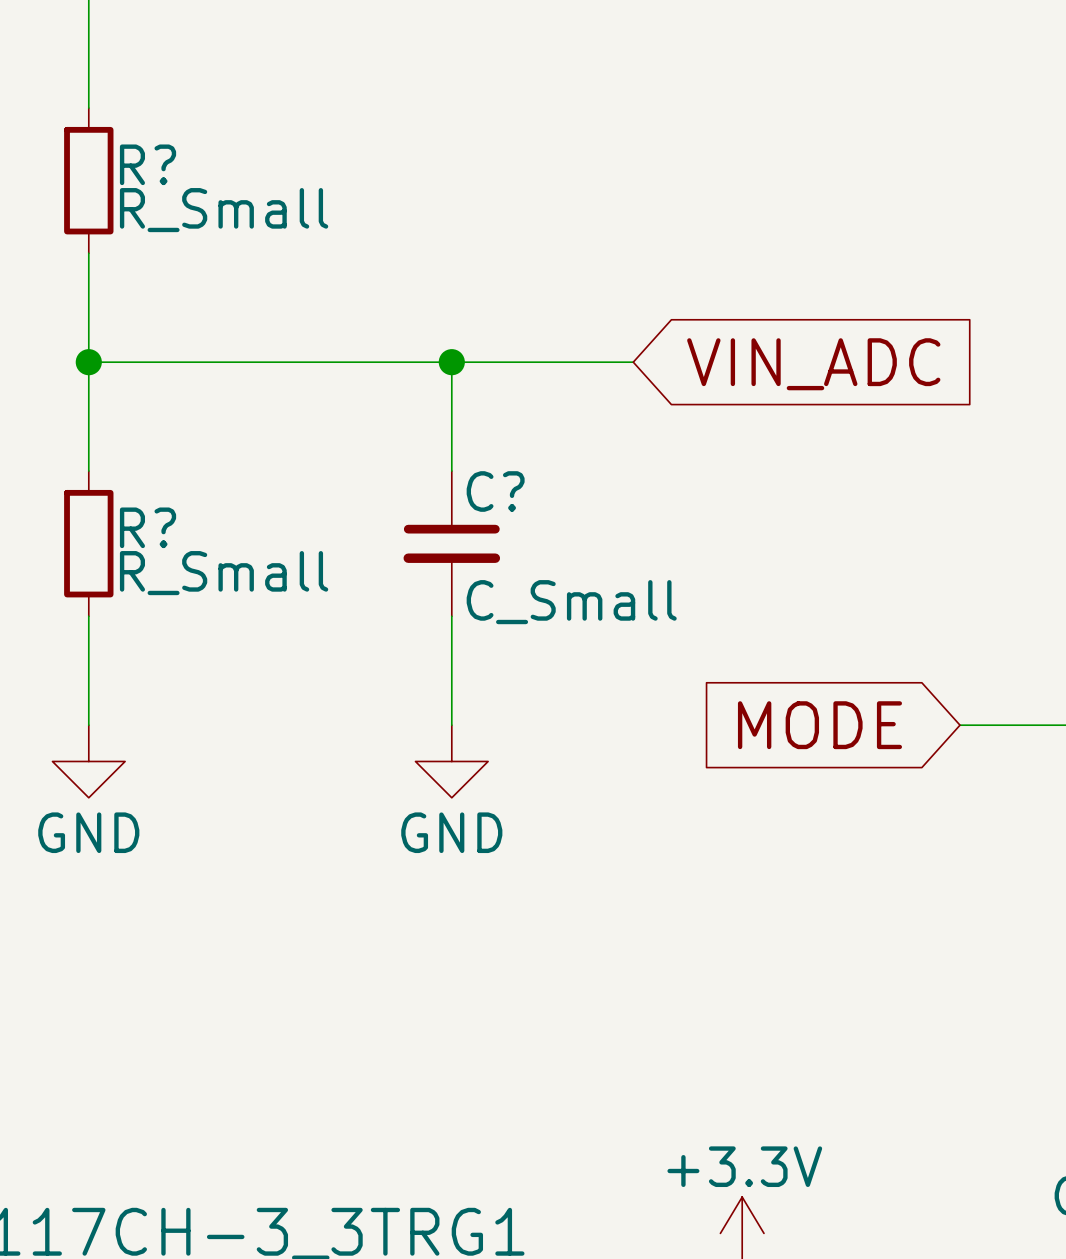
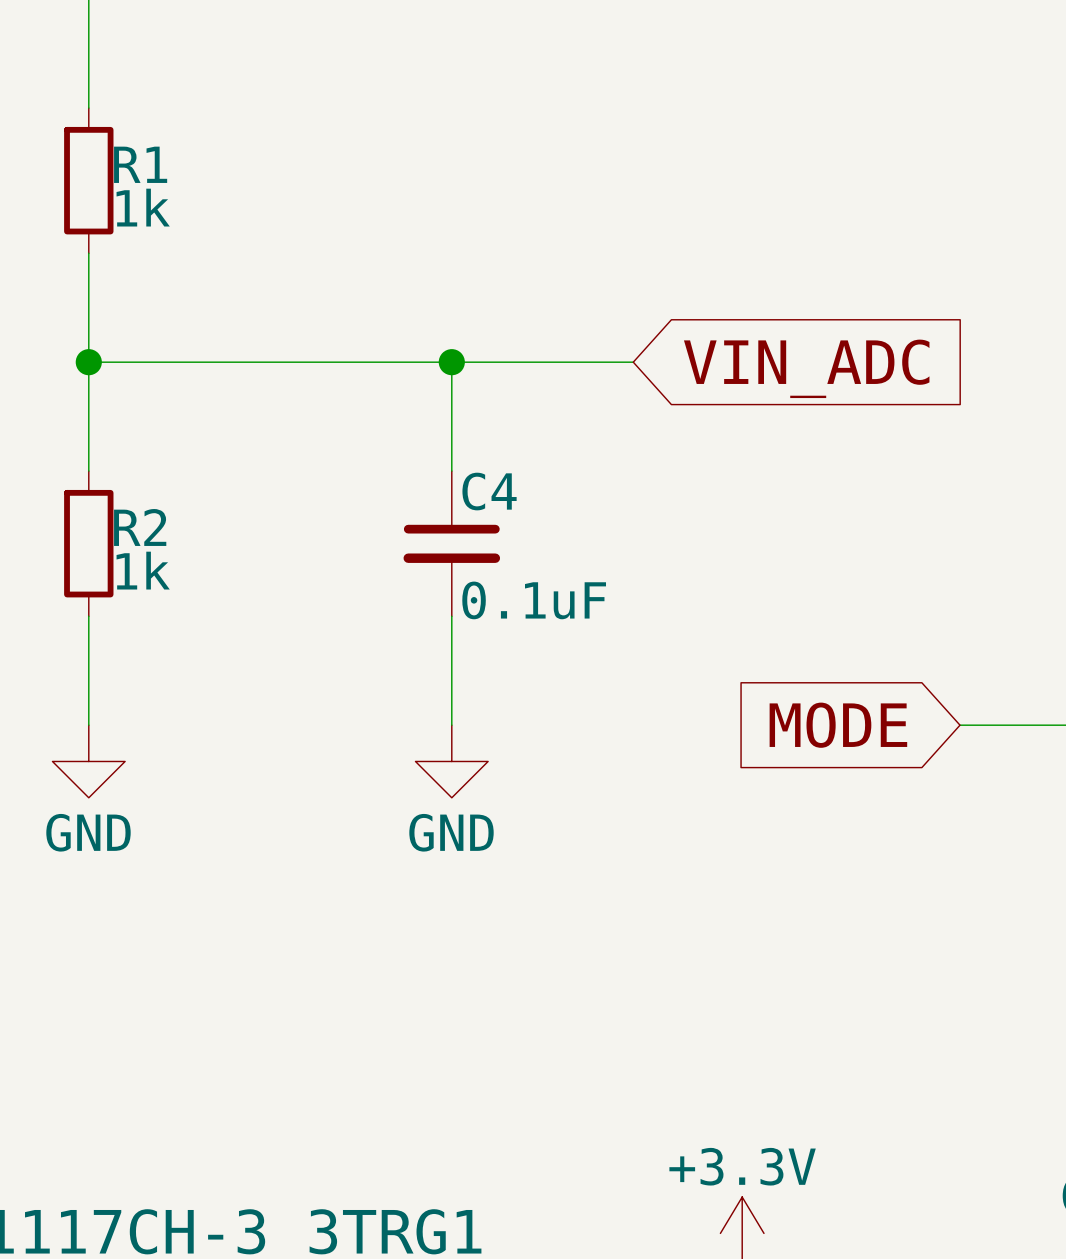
R? name: R? (148, 164) -> R1 (140, 164)
R? value: R_Small (224, 210) -> 1k (143, 207)
C? name: C? (495, 491) -> C4 (489, 491)
R? name: R? (148, 527) -> R2 (140, 527)
R? value: R_Small (224, 573) -> 1k (143, 570)
C? value: C_Small (571, 602) -> 0.1uF (534, 600)

